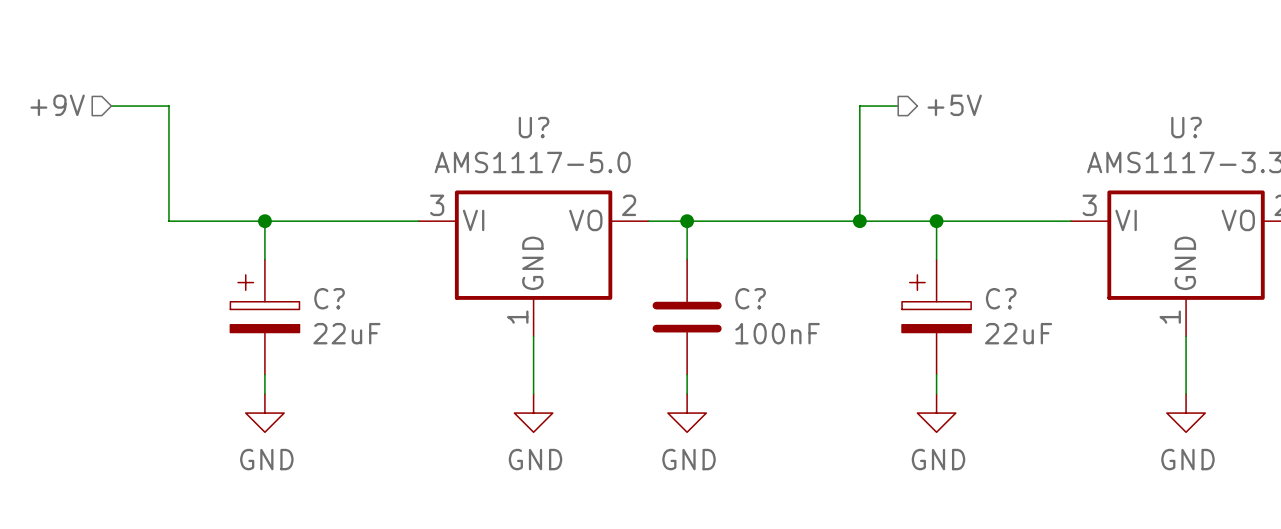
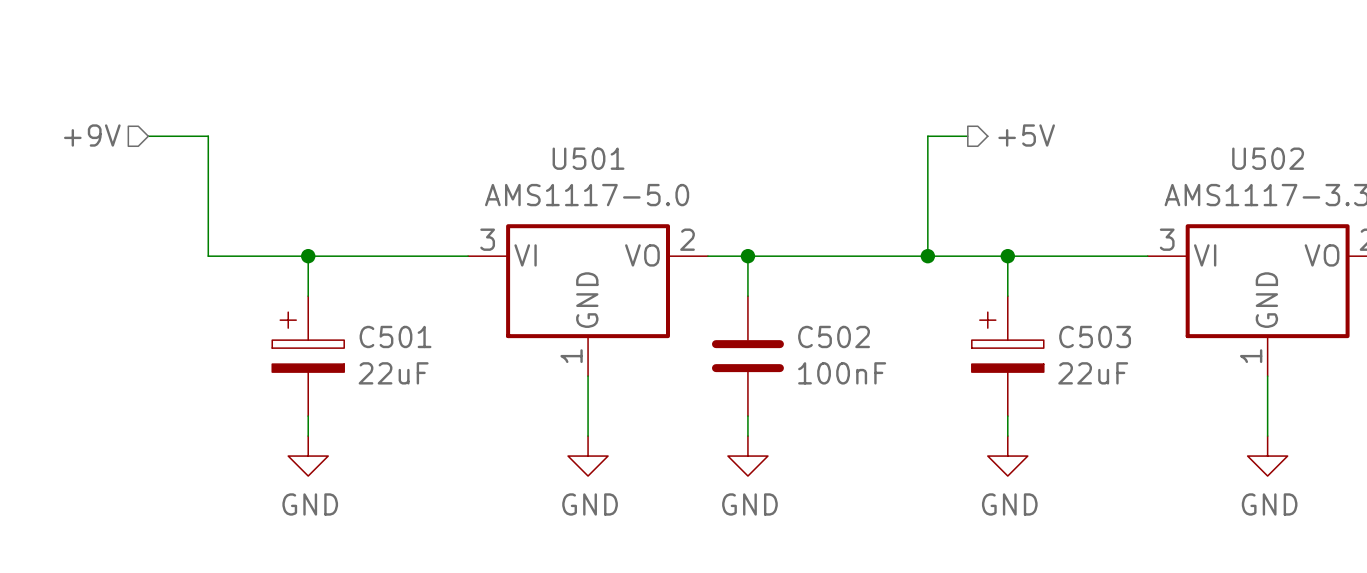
U? name: U? (534, 127) -> U501 (588, 158)
U? name: U? (1186, 127) -> U502 (1268, 158)
C? name: C? (329, 298) -> C501 (395, 336)
C? name: C? (750, 298) -> C502 (834, 336)
C? name: C? (1001, 298) -> C503 (1095, 336)

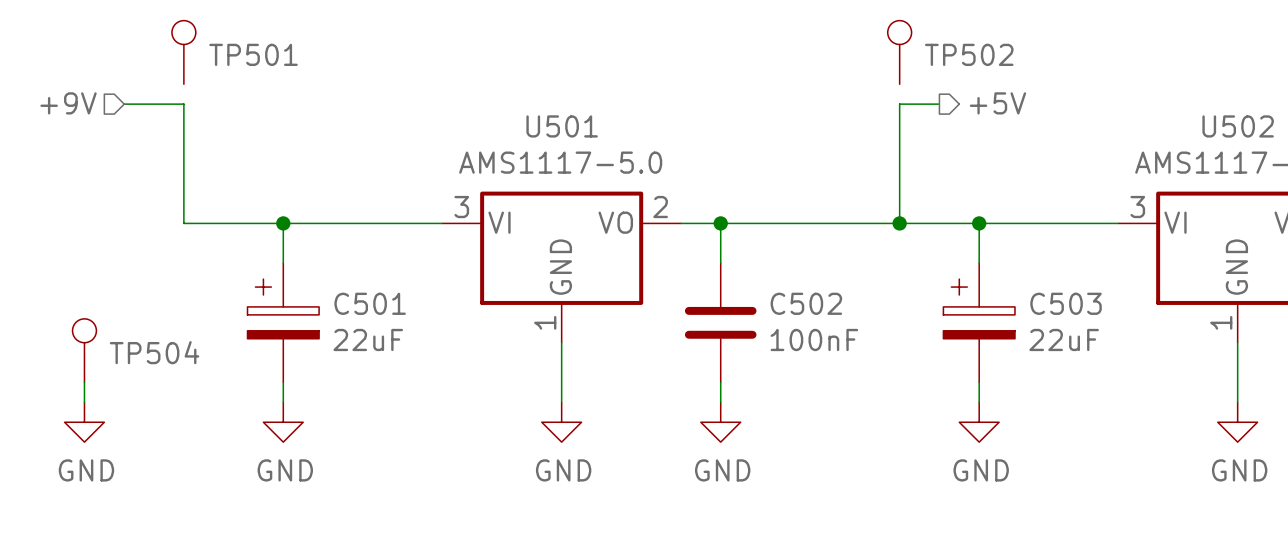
TP501: none -> (183, 52)
TP502: none -> (899, 52)
TP504: none -> (84, 350)
wire: none -> (84, 382) (84, 402)
power symbol: none -> GND (84, 422)

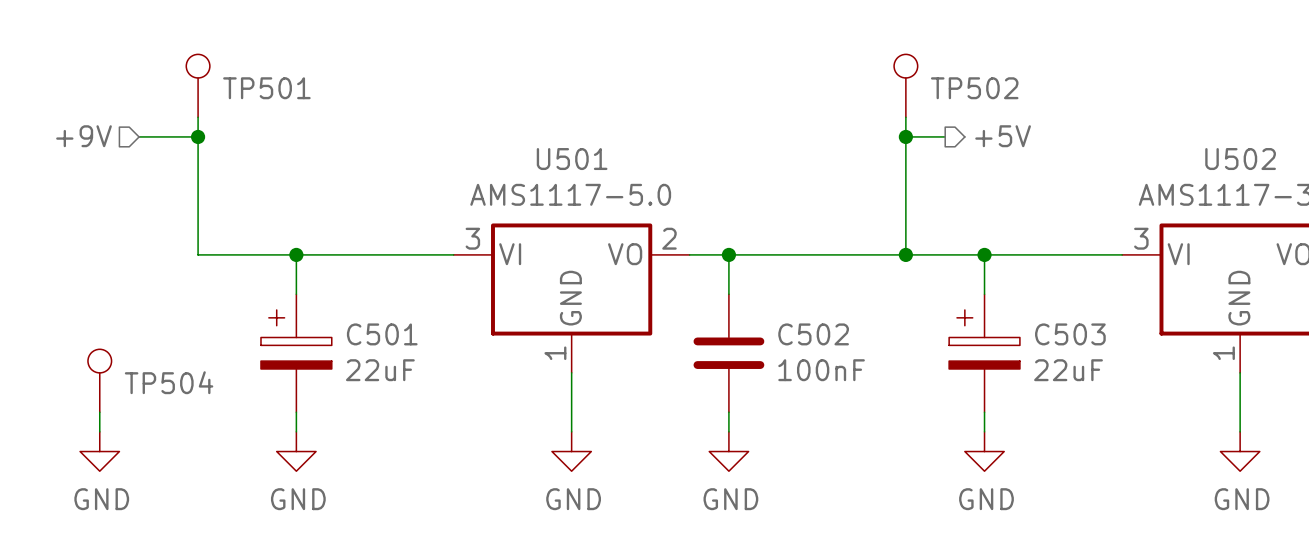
wire: none -> (198, 117) (198, 136)
wire: none -> (905, 117) (905, 136)
junction: none -> (198, 136)
junction: none -> (905, 136)

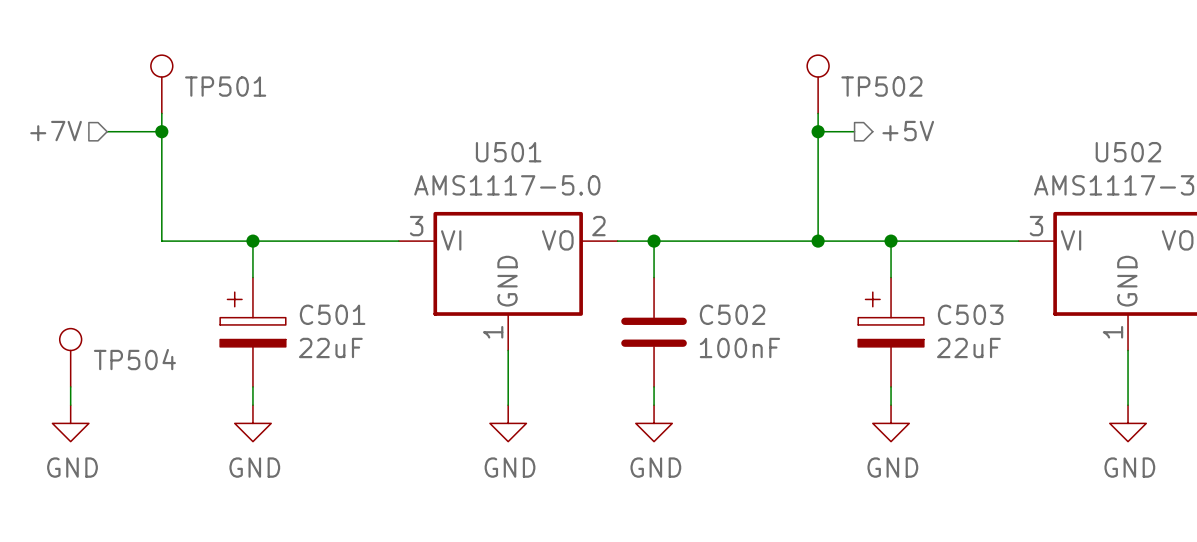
hierarchical label: +9V (84, 136) -> +7V (56, 131)

